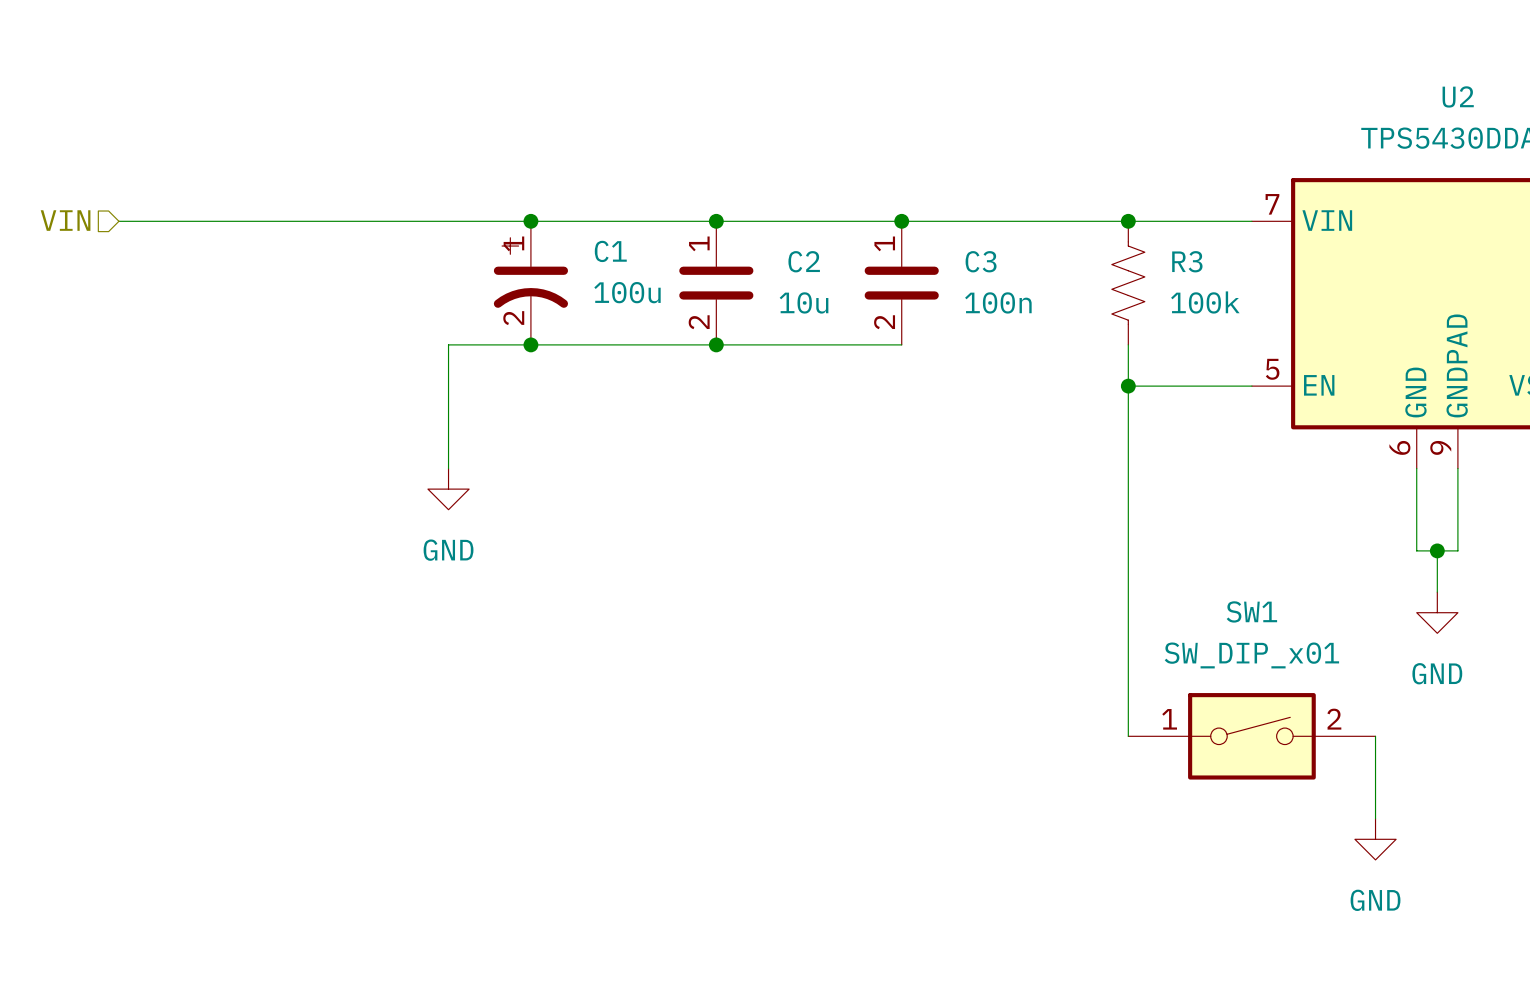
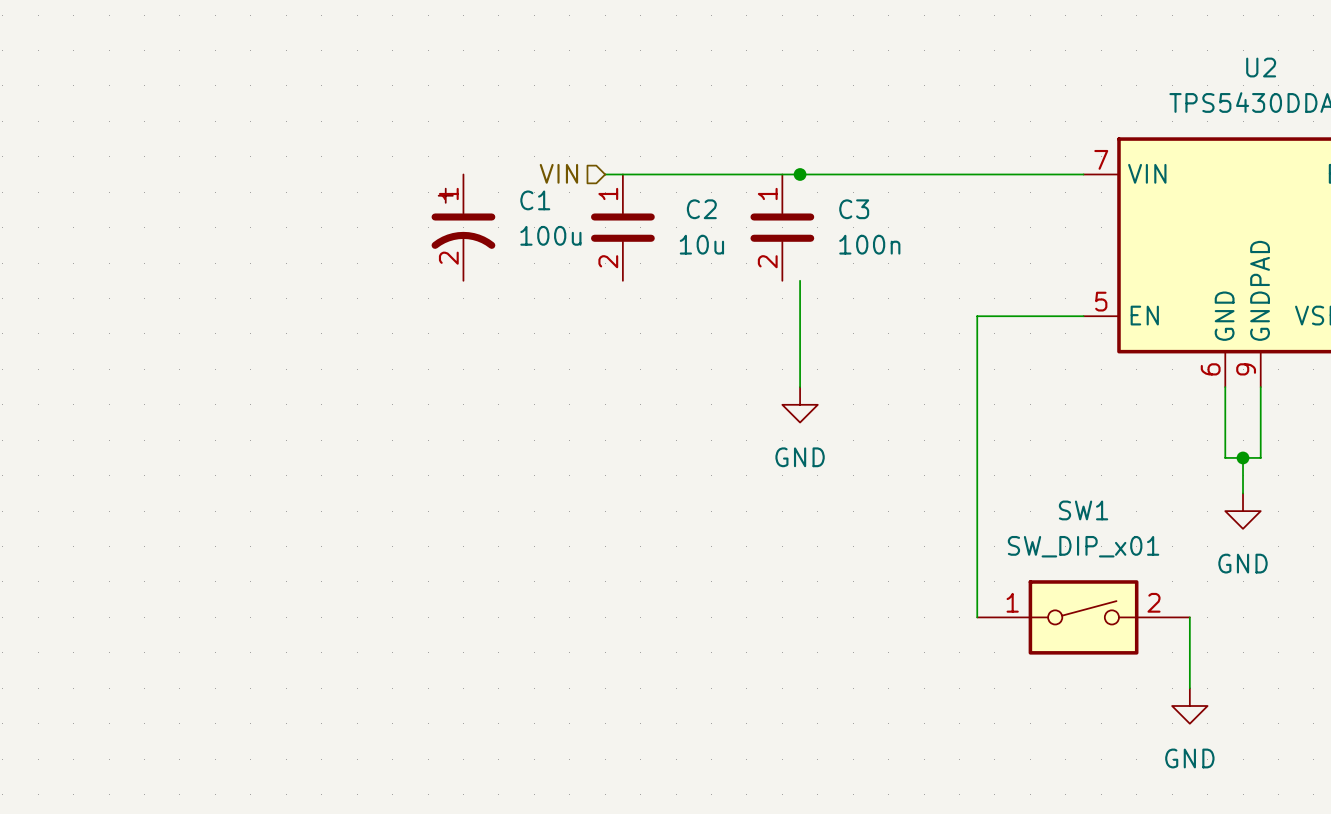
hierarchical label: VIN (65, 220) -> none
hierarchical label: none -> VIN (558, 173)
wire: (118, 221) (695, 221) -> none
junction: (530, 221) -> none
junction: (716, 221) -> none
junction position: (901, 221) -> (800, 174)
junction: (1128, 221) -> none
R3: 100k (1128, 283) -> none
junction: (530, 344) -> none
junction: (716, 344) -> none
wire: (901, 344) (448, 344) (448, 468) -> none
wire: none -> (800, 280) (800, 387)
wire: (1128, 344) (1128, 386) -> none
junction: (1128, 386) -> none
power symbol: GND (448, 489) -> none
power symbol: none -> GND (800, 404)

